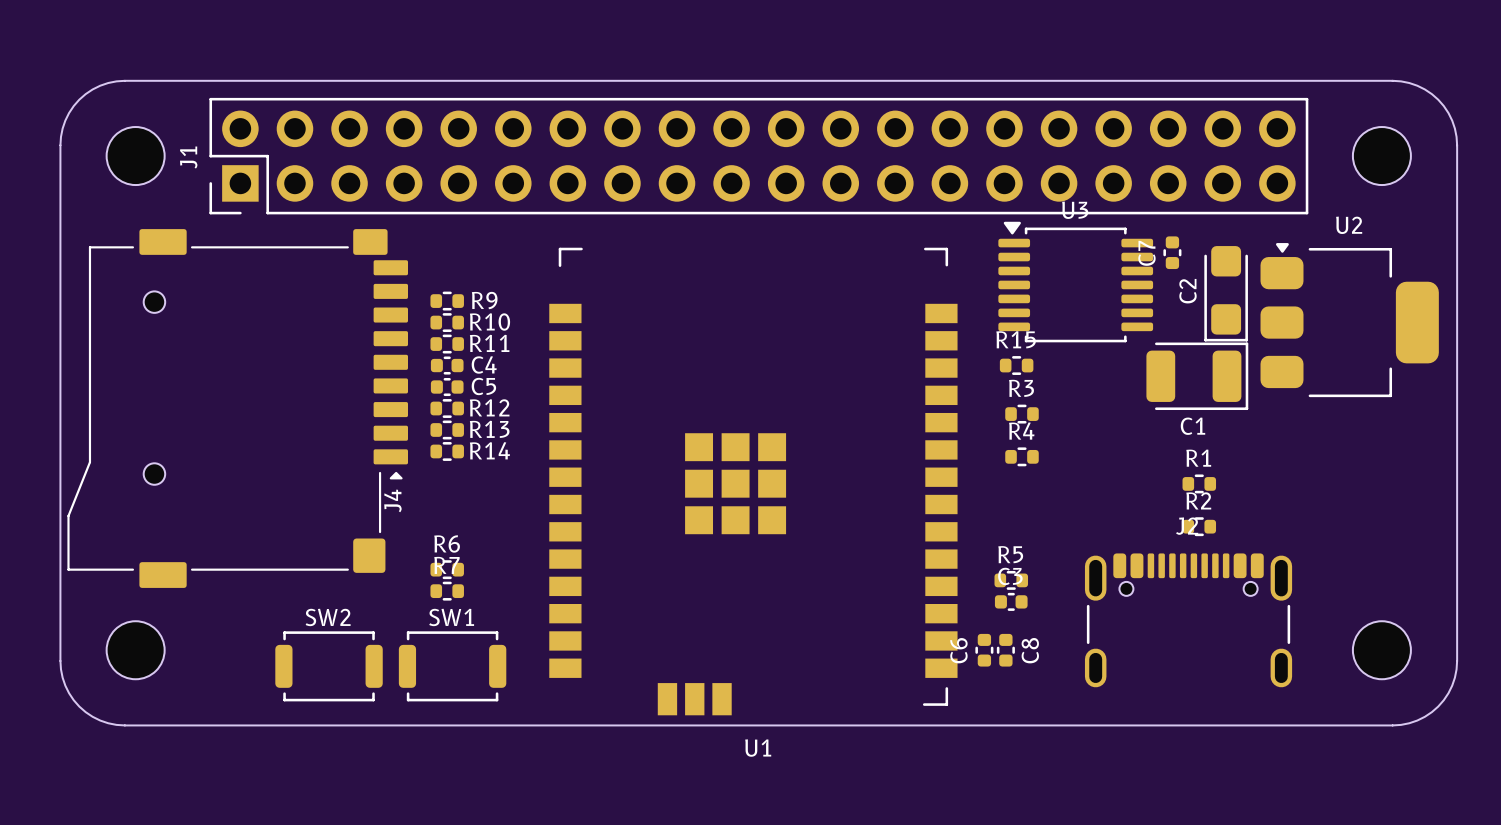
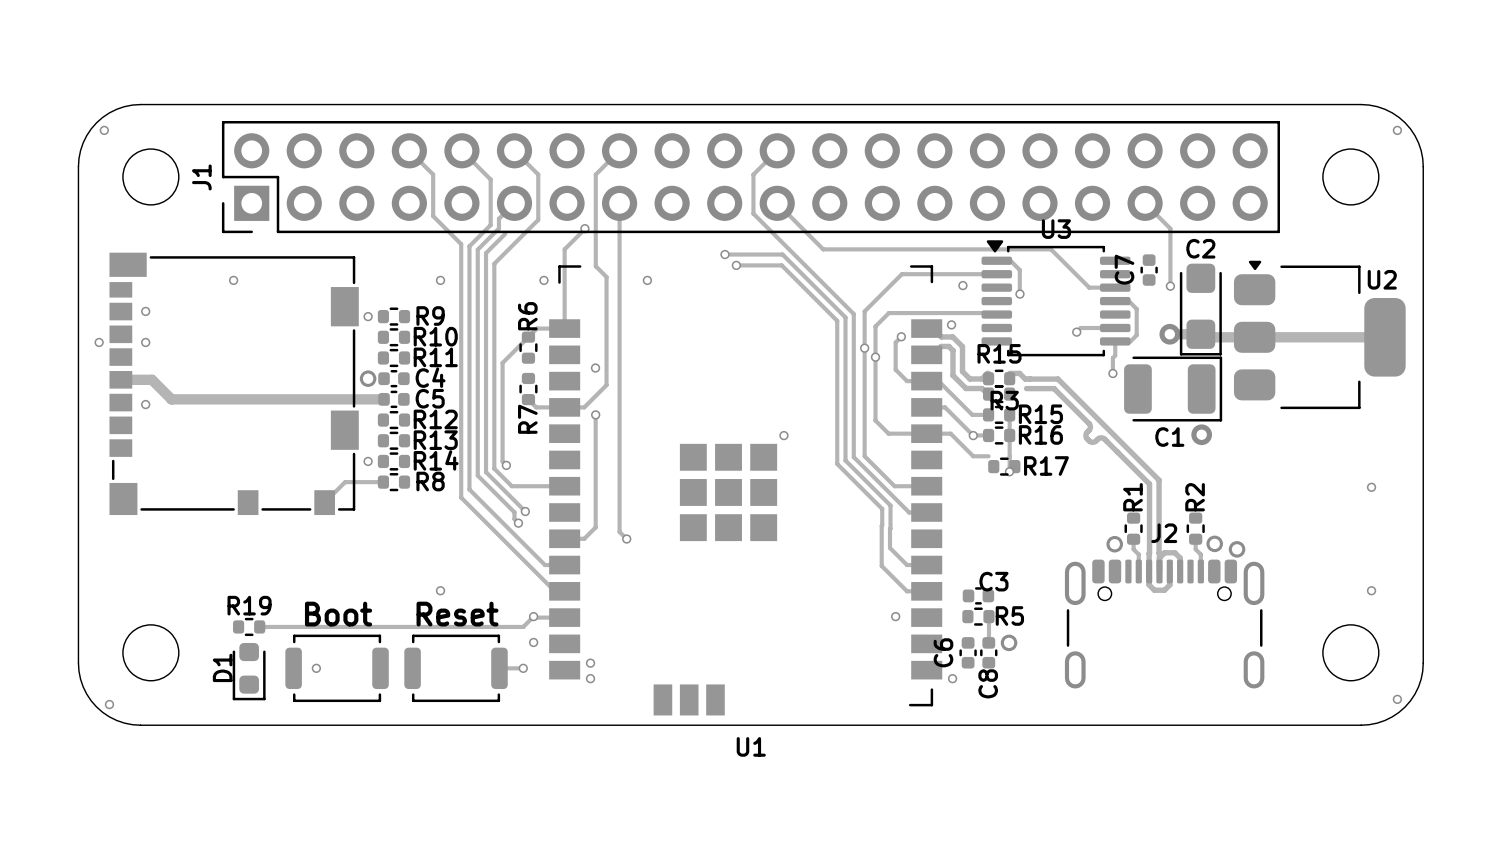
via: none -> (104, 130)
via: none -> (1397, 130)
track: none -> (409, 150) (433, 174) (433, 216) (461, 244) (461, 497) (554, 591) (564, 591)
track: none -> (461, 150) (490, 179) (490, 225) (469, 246) (469, 489) (545, 565) (564, 565)
track: none -> (514, 150) (538, 174) (538, 219) (494, 263) (494, 468) (511, 486) (564, 486)
track: none -> (619, 150) (595, 174) (595, 266) (606, 277) (606, 385) (584, 407) (536, 407) (528, 399)
track: none -> (777, 150) (753, 174) (753, 213) (853, 314) (853, 457) (909, 512) (926, 512)
track: none -> (514, 203) (498, 218) (498, 228) (477, 249) (477, 475) (514, 512) (514, 519) (518, 523)
track: none -> (619, 203) (619, 531) (626, 539)
track: none -> (777, 203) (823, 249) (1051, 249) (1089, 287) (1115, 287)
track: none -> (1145, 203) (1170, 228) (1170, 286)
via: none -> (584, 228)
track: none -> (584, 229) (564, 249) (564, 328) (536, 328) (502, 362) (502, 461) (506, 465)
track: none -> (505, 233) (486, 253) (486, 472) (525, 511)
U2 name position: U2 (1349, 225) -> U2 (1382, 279)
track: none -> (724, 254) (782, 254) (845, 317) (845, 460) (890, 505) (889, 547) (907, 565) (926, 565)
via: none -> (724, 254)
track: none -> (996, 260) (1010, 260) (1019, 270) (1019, 293)
track: none -> (736, 265) (781, 265) (837, 320) (837, 463) (882, 508) (881, 565) (907, 591) (926, 591)
via: none -> (736, 265)
track: none -> (996, 274) (901, 274) (864, 311) (864, 456) (894, 486) (926, 486)
via: none -> (233, 280)
via: none -> (440, 280)
via: none -> (543, 280)
via: none -> (647, 280)
via: none -> (962, 285)
via: none -> (1170, 286)
via: none -> (1019, 294)
track: none -> (1115, 301) (1128, 301) (1136, 308) (1136, 335) (1130, 341) (1115, 341) (1112, 373)
C2 name rotation: 0° (1188, 291) -> 90° clockwise (1200, 248)
C2 name position: C2 (1188, 291) -> C2 (1200, 248)
via: none -> (145, 311)
track: none -> (996, 314) (888, 313) (875, 326) (875, 420) (888, 433) (950, 433) (973, 456) (988, 456)
via: none -> (368, 316)
R9 position: (447, 301) -> (393, 316)
via: none -> (951, 324)
track: none -> (1115, 327) (1080, 327) (1076, 332)
track: none -> (926, 328) (932, 328) (941, 336) (952, 336) (962, 346) (962, 371) (969, 378) (981, 378) (988, 373)
via: none -> (1076, 332)
track: none -> (1169, 334) (1200, 334) (1203, 337) (1384, 337)
via: none -> (1169, 334)
R10 position: (447, 322) -> (393, 337)
track: none -> (901, 336) (895, 342) (895, 369) (907, 381) (938, 381) (972, 414) (988, 414)
via: none -> (901, 336)
via: none -> (99, 342)
via: none -> (145, 342)
via: none -> (864, 348)
track: none -> (926, 354) (932, 354) (941, 346) (948, 346) (952, 350) (952, 375) (966, 388) (981, 388) (988, 394)
via: none -> (875, 357)
R11 position: (447, 344) -> (393, 357)
via: none -> (595, 368)
track: none -> (1009, 373) (1019, 373) (1025, 378) (1057, 379) (1159, 480) (1159, 571)
via: none -> (1112, 373)
via: none -> (368, 378)
C4 position: (447, 365) -> (393, 378)
track: none -> (120, 379) (152, 379) (171, 399) (384, 399)
part: none -> (234, 383)
track: none -> (1026, 388) (1054, 388) (1089, 424) (1090, 428) (1085, 434) (1087, 439) (1092, 442) (1099, 438) (1104, 438) (1149, 484) (1149, 584) (1154, 590) (1164, 590) (1169, 584) (1169, 571)
C5 position: (447, 387) -> (393, 399)
via: none -> (145, 404)
track: none -> (926, 407) (945, 407) (973, 435) (988, 435)
track: none -> (595, 414) (595, 527) (584, 538) (564, 538)
via: none -> (595, 414)
R15: none -> (999, 414)
track: none -> (1009, 414) (1009, 471)
J4: (237, 408) -> none
R12 position: (447, 408) -> (393, 420)
R3 position: (1022, 414) -> (999, 394)
via: none -> (1201, 434)
via: none -> (783, 435)
via: none -> (973, 435)
R16: none -> (999, 435)
R13 position: (447, 429) -> (393, 440)
R4 name: R4 (1021, 431) -> R17 (1046, 465)
via: none -> (368, 461)
R14 position: (447, 451) -> (393, 461)
via: none -> (506, 465)
via: none -> (1009, 471)
track: none -> (383, 482) (345, 482) (324, 502)
R8: none -> (393, 482)
via: none -> (1371, 487)
R1 rotation: 0° (1199, 483) -> 90° clockwise (1133, 528)
R1 position: (1199, 483) -> (1133, 528)
via: none -> (525, 511)
via: none -> (518, 523)
R2 rotation: 0° (1199, 526) -> 90° clockwise (1195, 528)
R2 position: (1199, 526) -> (1195, 528)
via: none -> (626, 539)
track: none -> (1133, 539) (1133, 549) (1138, 554) (1138, 571)
track: none -> (1195, 539) (1195, 549) (1200, 554) (1200, 571)
via: none -> (1114, 544)
via: none -> (1214, 543)
via: none -> (1237, 549)
track: none -> (1159, 558) (1164, 552) (1174, 552) (1180, 558) (1180, 571)
R5 name position: R5 (1010, 554) -> R5 (1009, 615)
R6 rotation: 0° (447, 569) -> 90° clockwise (528, 347)
R6 position: (447, 569) -> (528, 347)
R5 position: (1011, 580) -> (978, 616)
via: none -> (440, 590)
via: none -> (1371, 590)
R7 rotation: 0° (447, 591) -> 90° clockwise (528, 389)
R7 position: (447, 591) -> (528, 389)
C3 position: (1011, 601) -> (978, 595)
text: none -> Boot (338, 614)
text: none -> Reset (457, 614)
via: none -> (533, 616)
via: none -> (895, 616)
track: none -> (988, 616) (988, 642)
track: none -> (564, 617) (533, 616) (523, 626) (259, 626)
SW2 name: SW2 (328, 617) -> none
SW1 name: SW1 (451, 617) -> none
R19: none -> (249, 626)
via: none -> (533, 642)
via: none -> (1009, 642)
C8 name position: C8 (1030, 650) -> C8 (988, 683)
via: none -> (590, 663)
via: none -> (316, 668)
track: none -> (499, 668) (523, 668)
via: none -> (523, 668)
D1: none -> (249, 671)
via: none -> (590, 678)
via: none -> (952, 678)
via: none -> (1397, 699)
via: none -> (109, 704)

